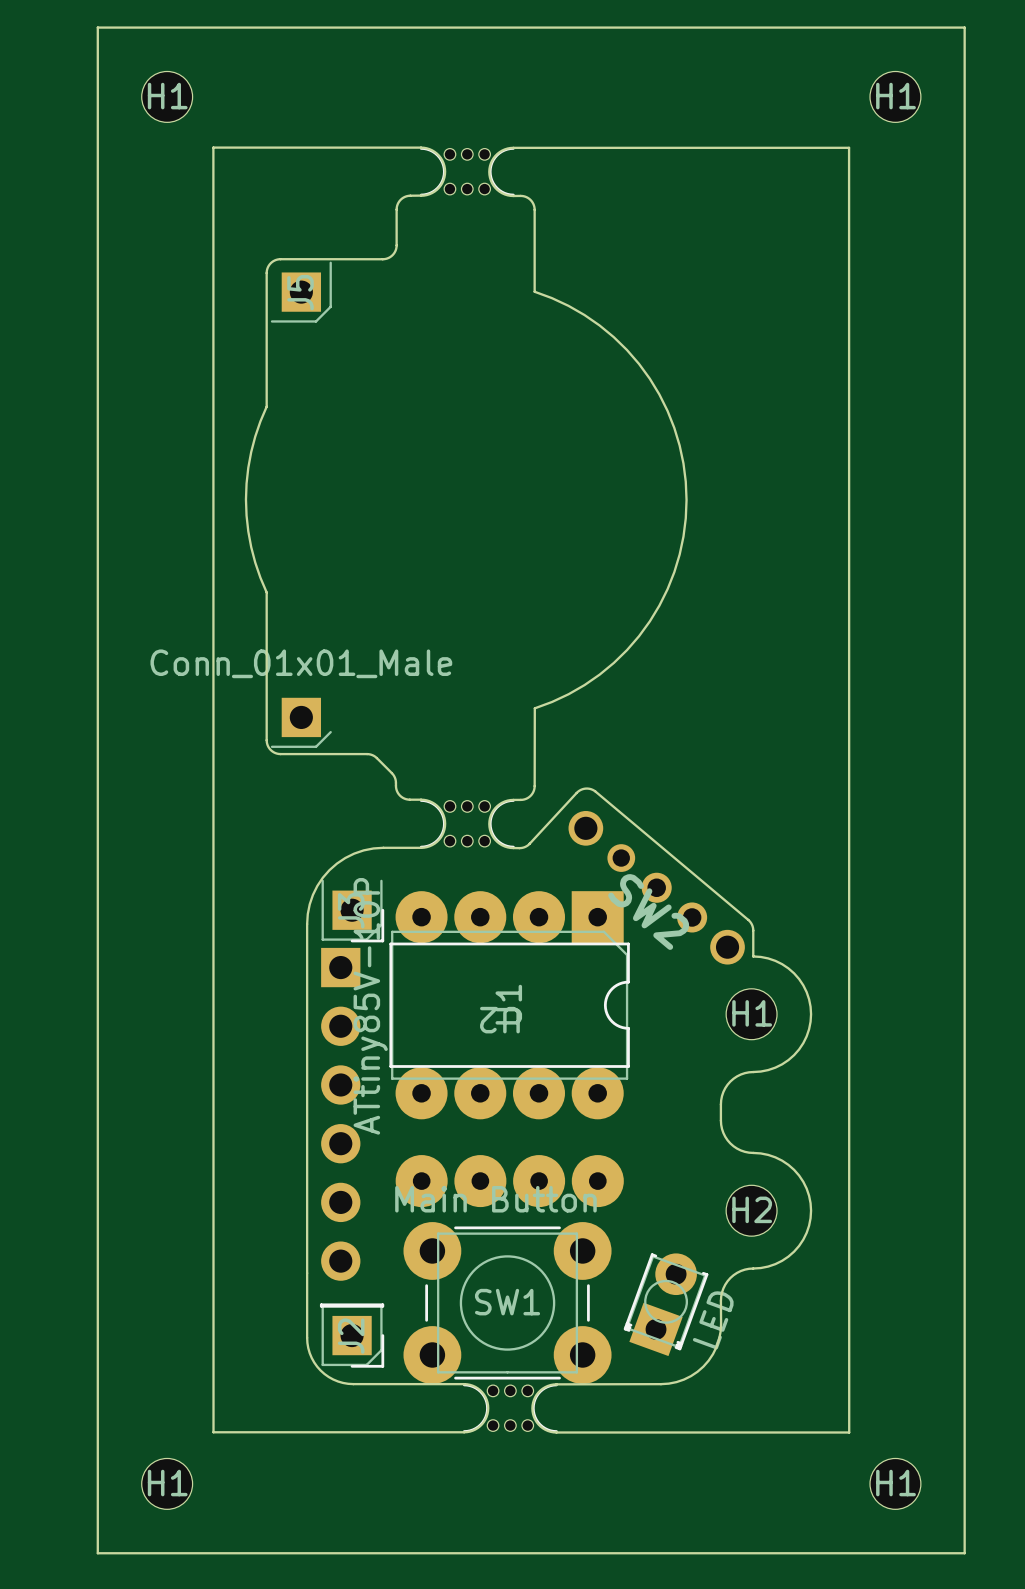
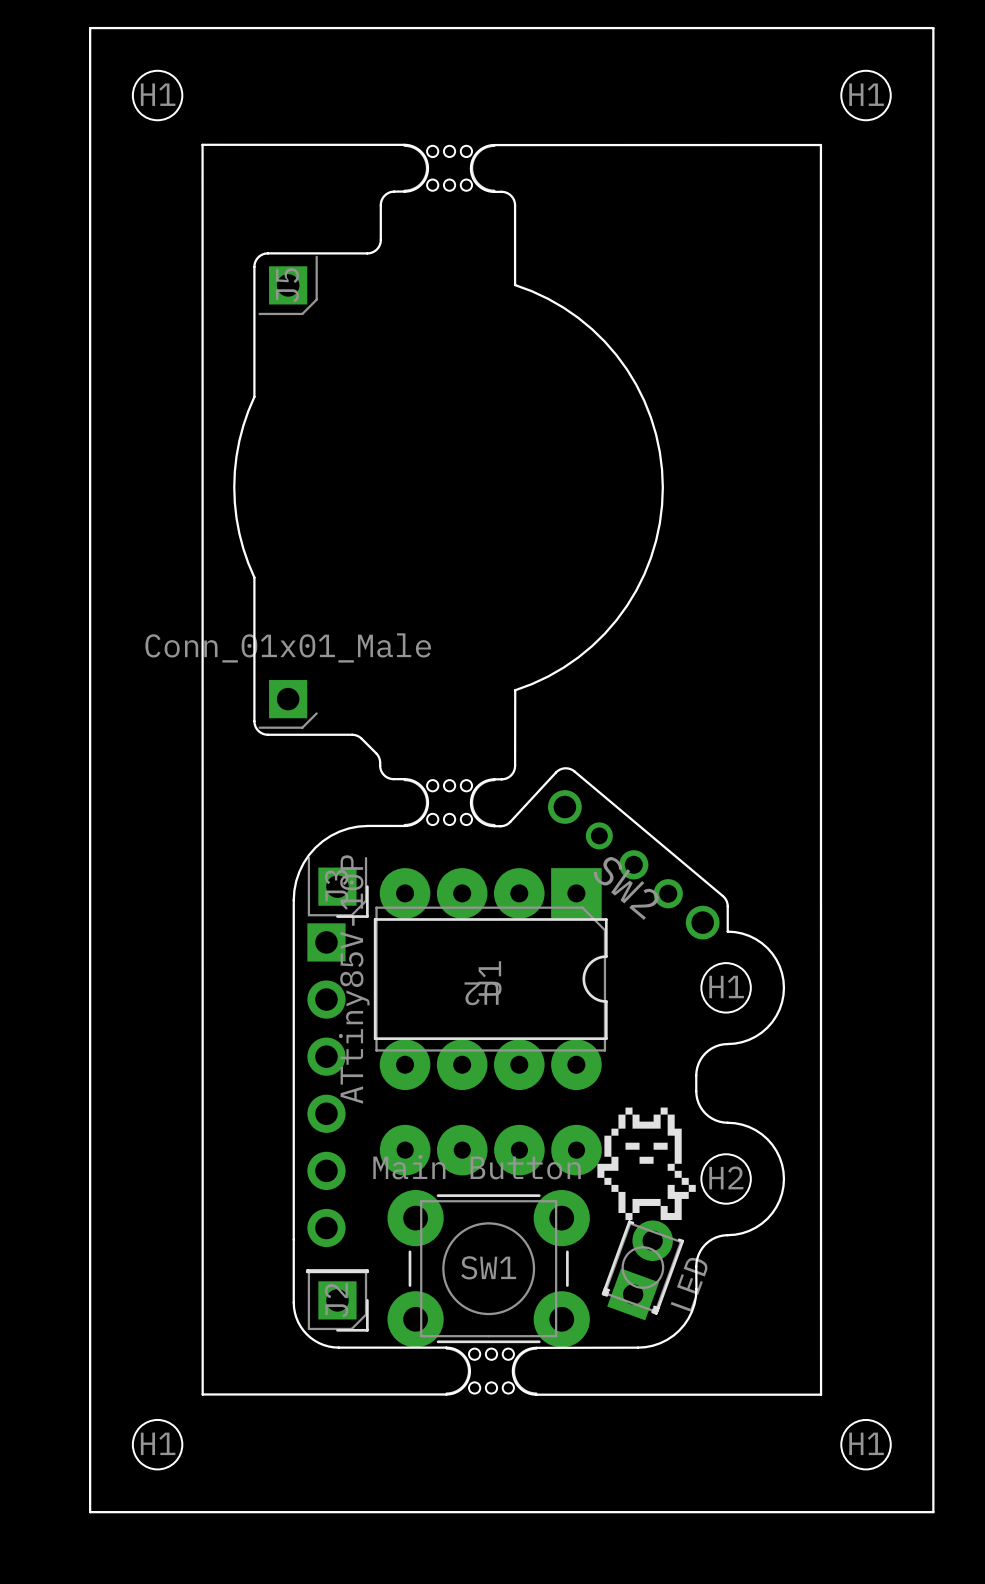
drawing: none -> [597, 1107, 696, 1221]

